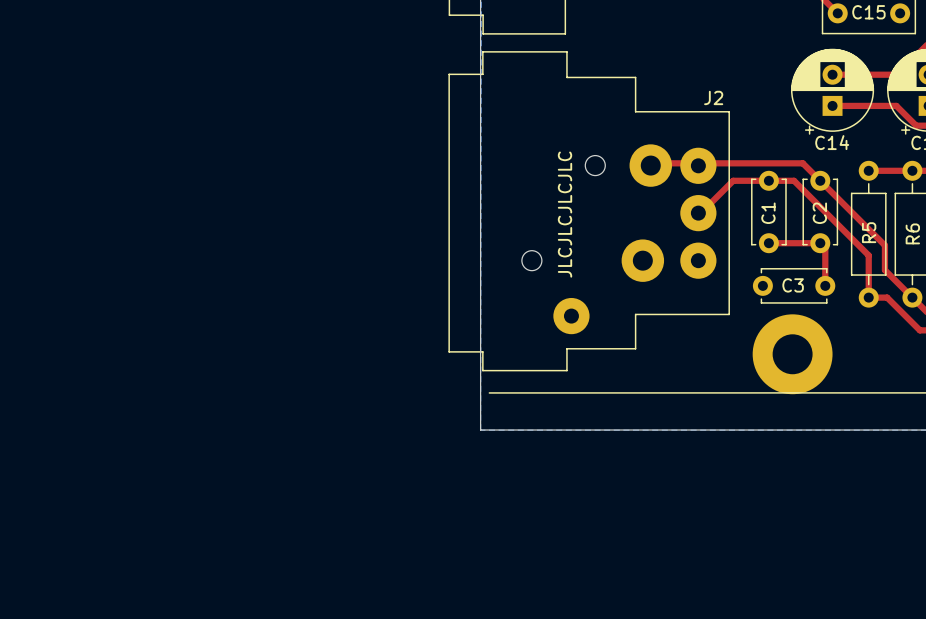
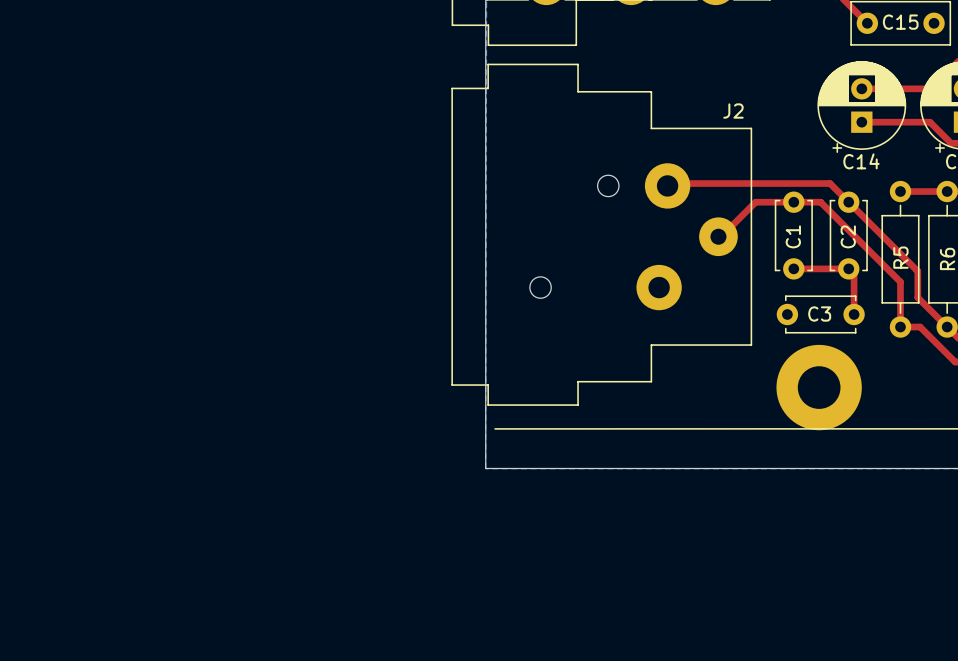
J2 footprint: [448, 51, 730, 372] -> [451, 63, 753, 406]
part: (698, 165) -> none
text: JLCJLCJLCJLC (565, 214) -> none
part: (698, 260) -> none

